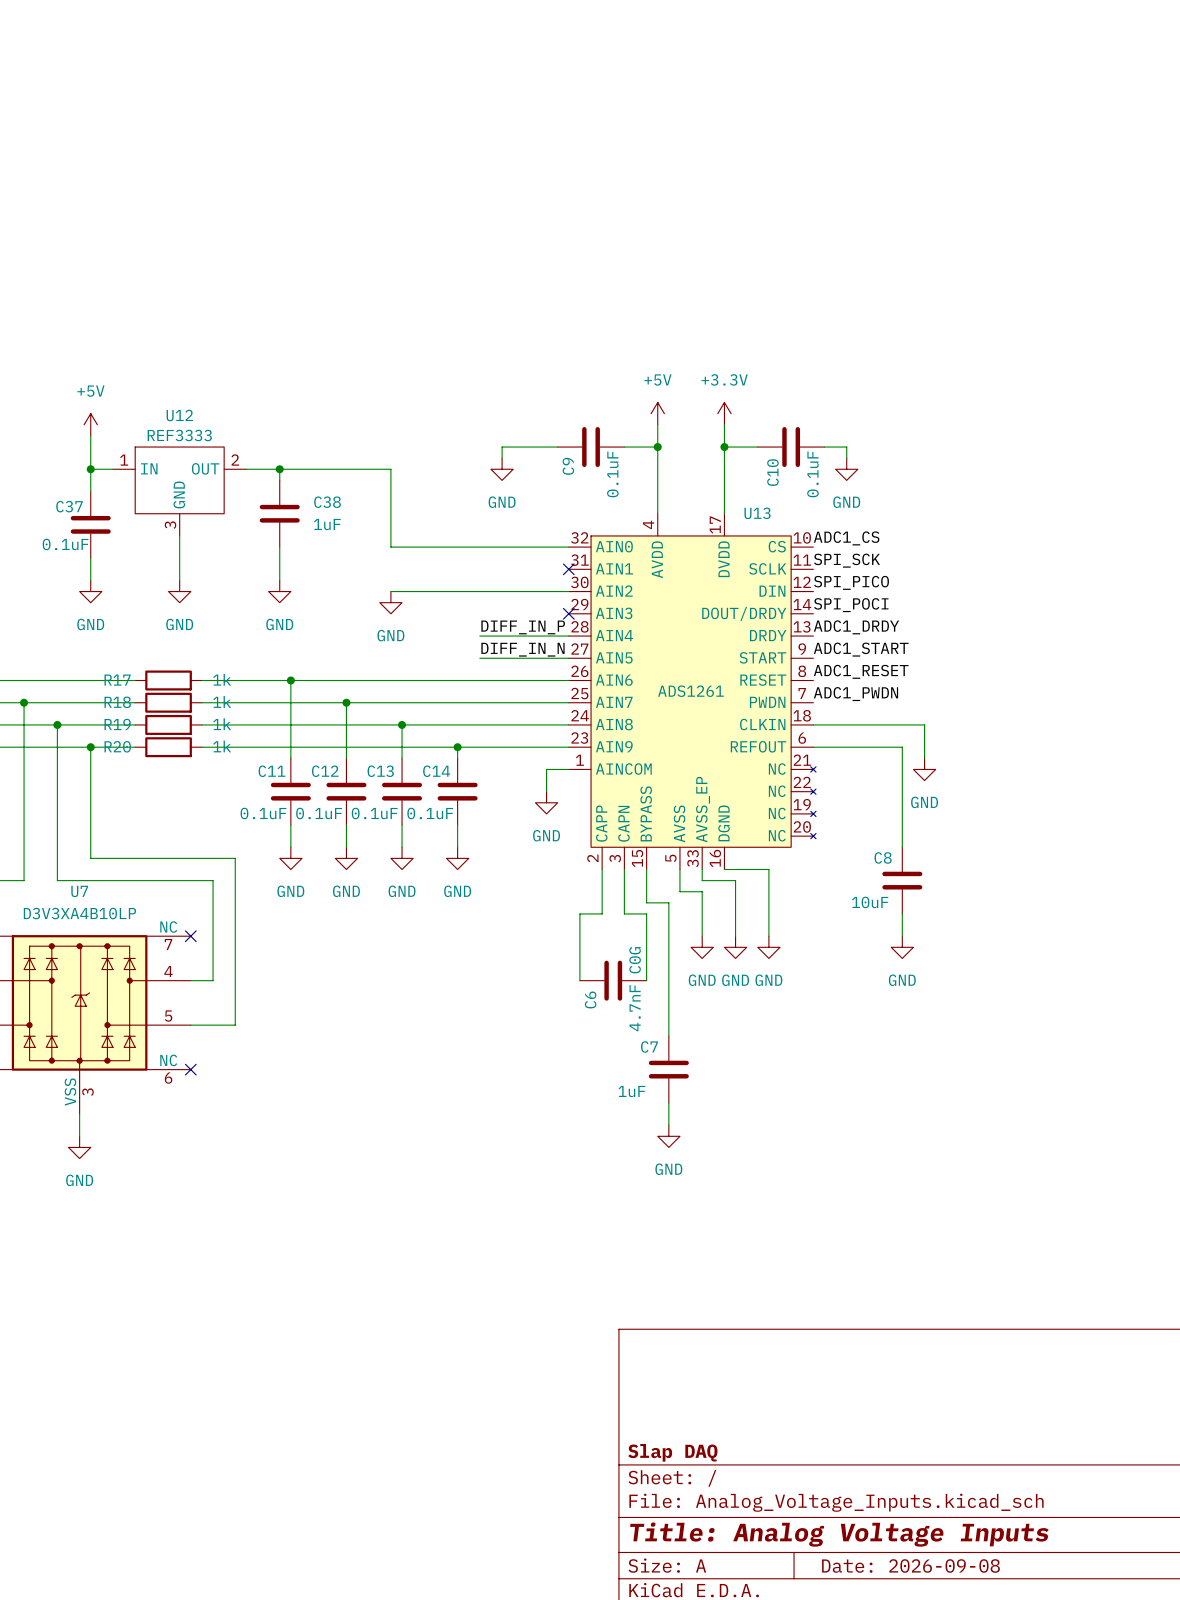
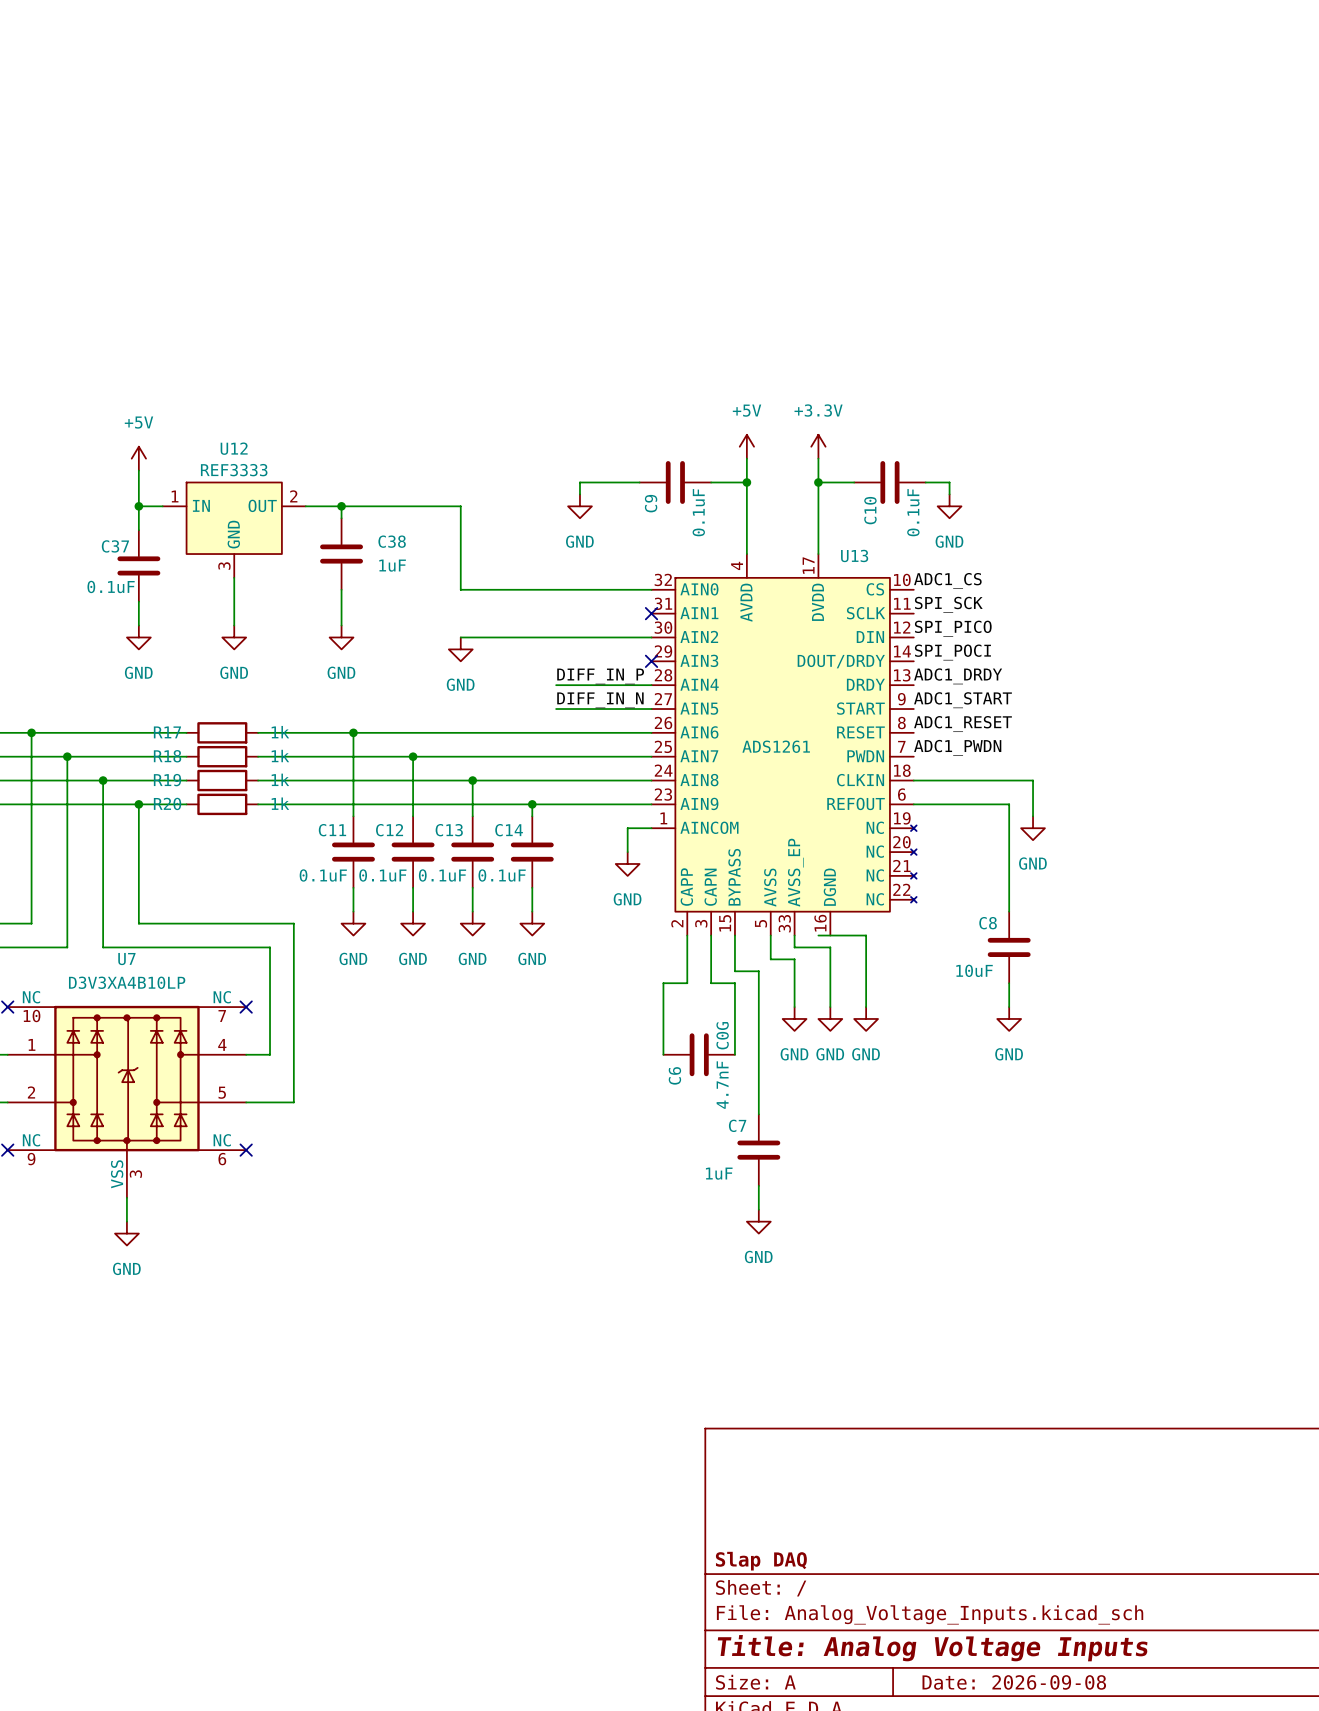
U12 symbol: [112, 447, 247, 536] -> [162, 482, 306, 578]
U13 symbol: [568, 513, 817, 870] -> [651, 554, 917, 936]

